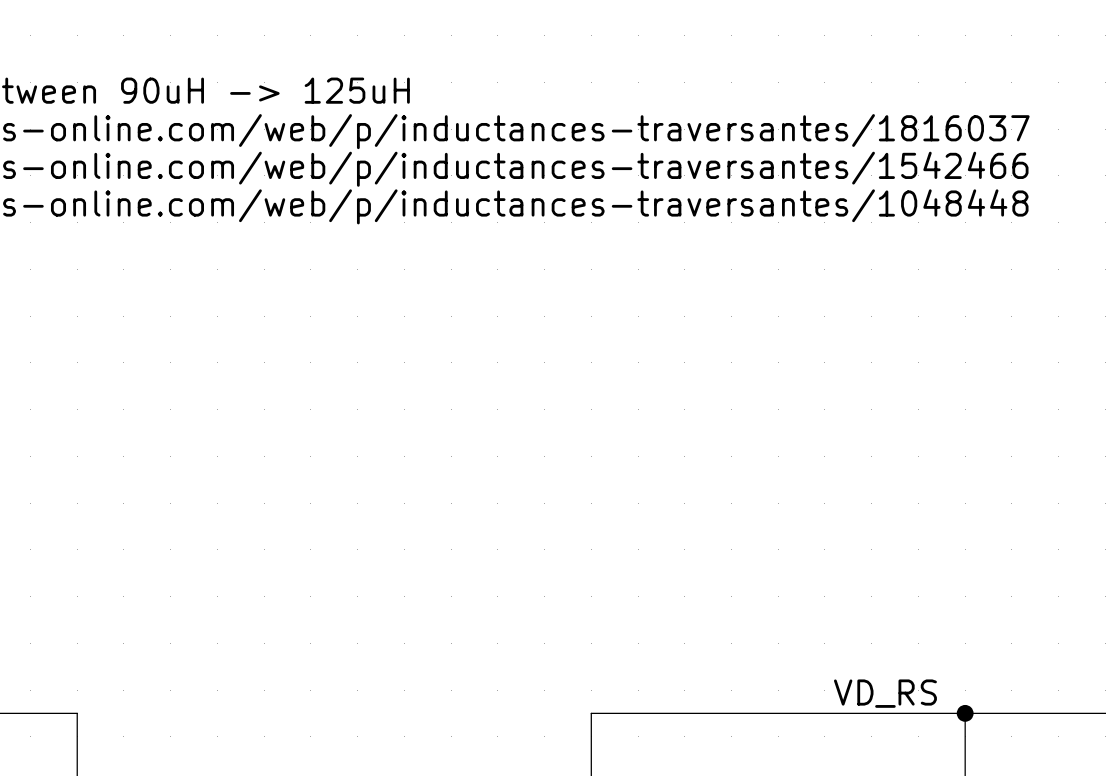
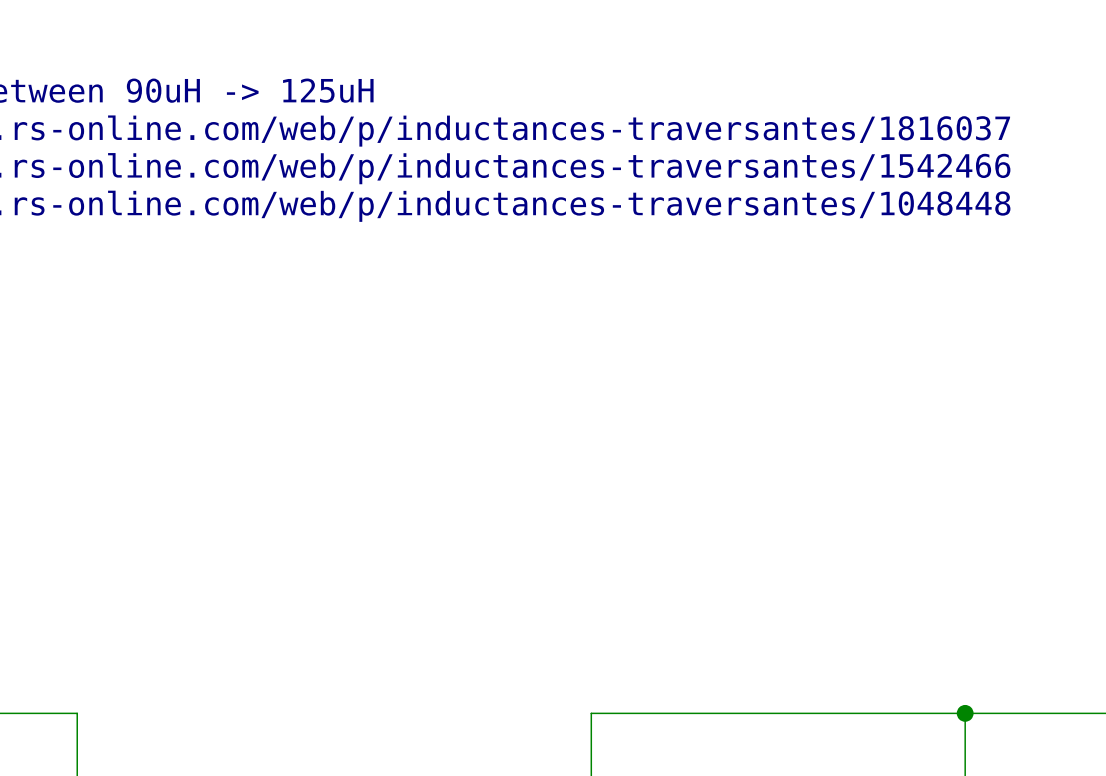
label: VD_RS (885, 693) -> none

